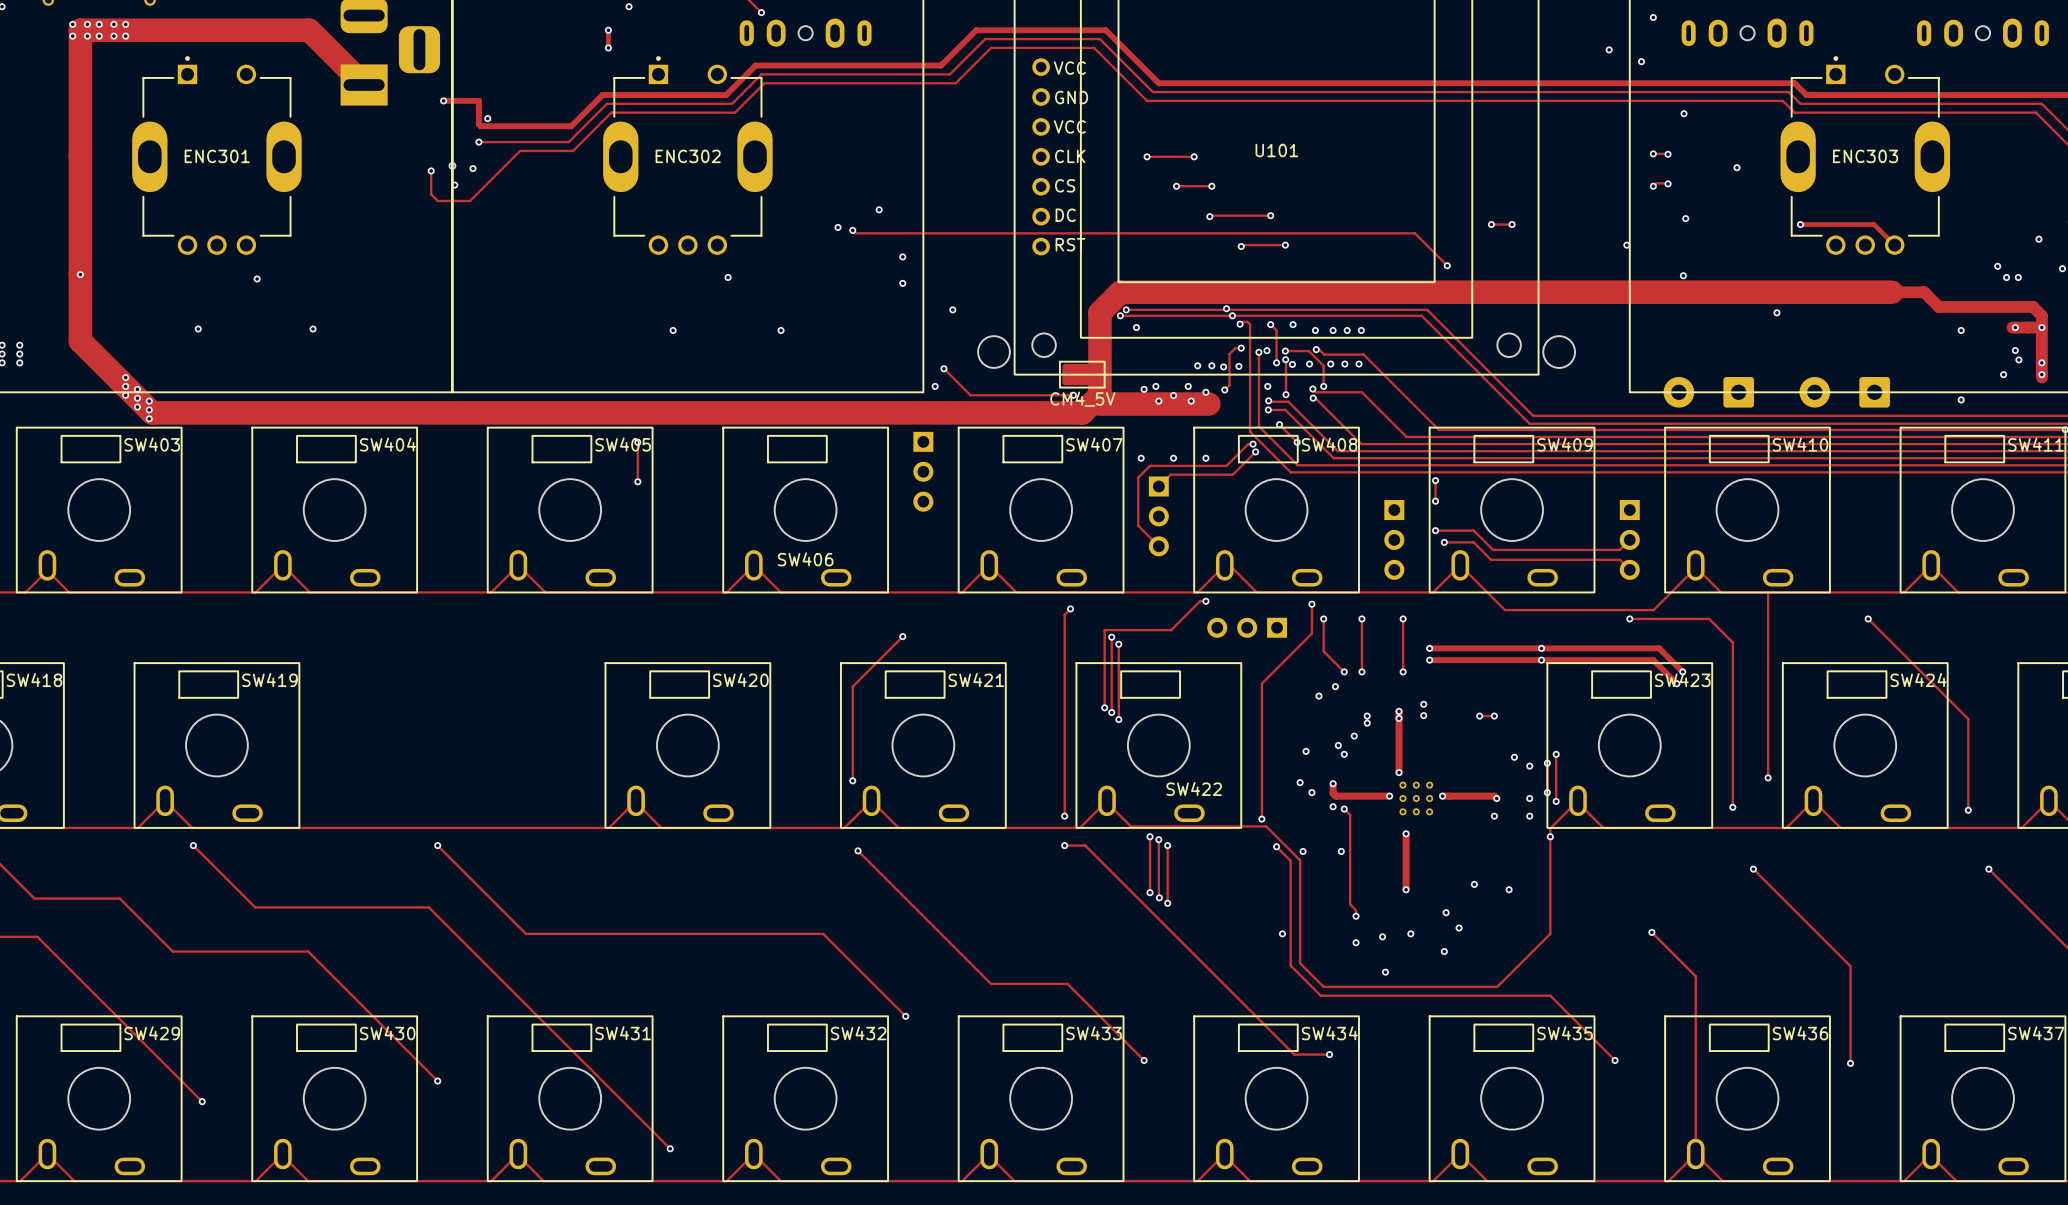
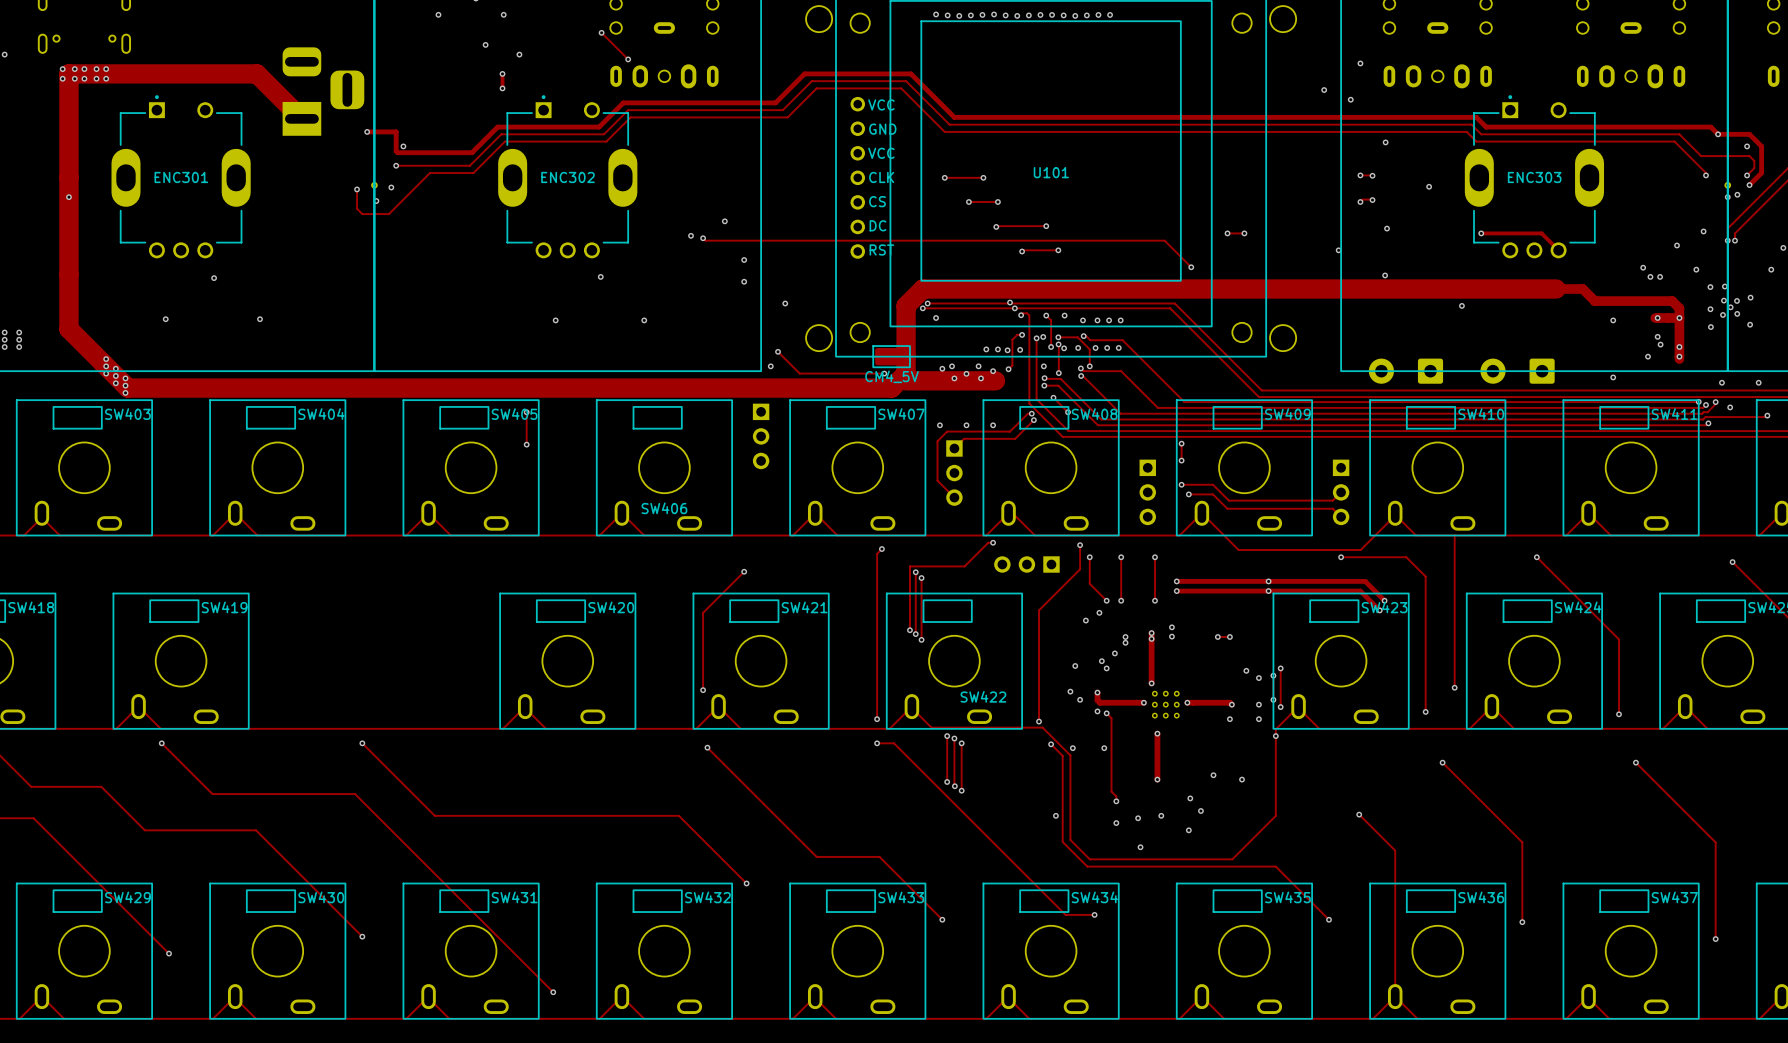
via: none -> (68, 197)
via: (80, 274) -> none

